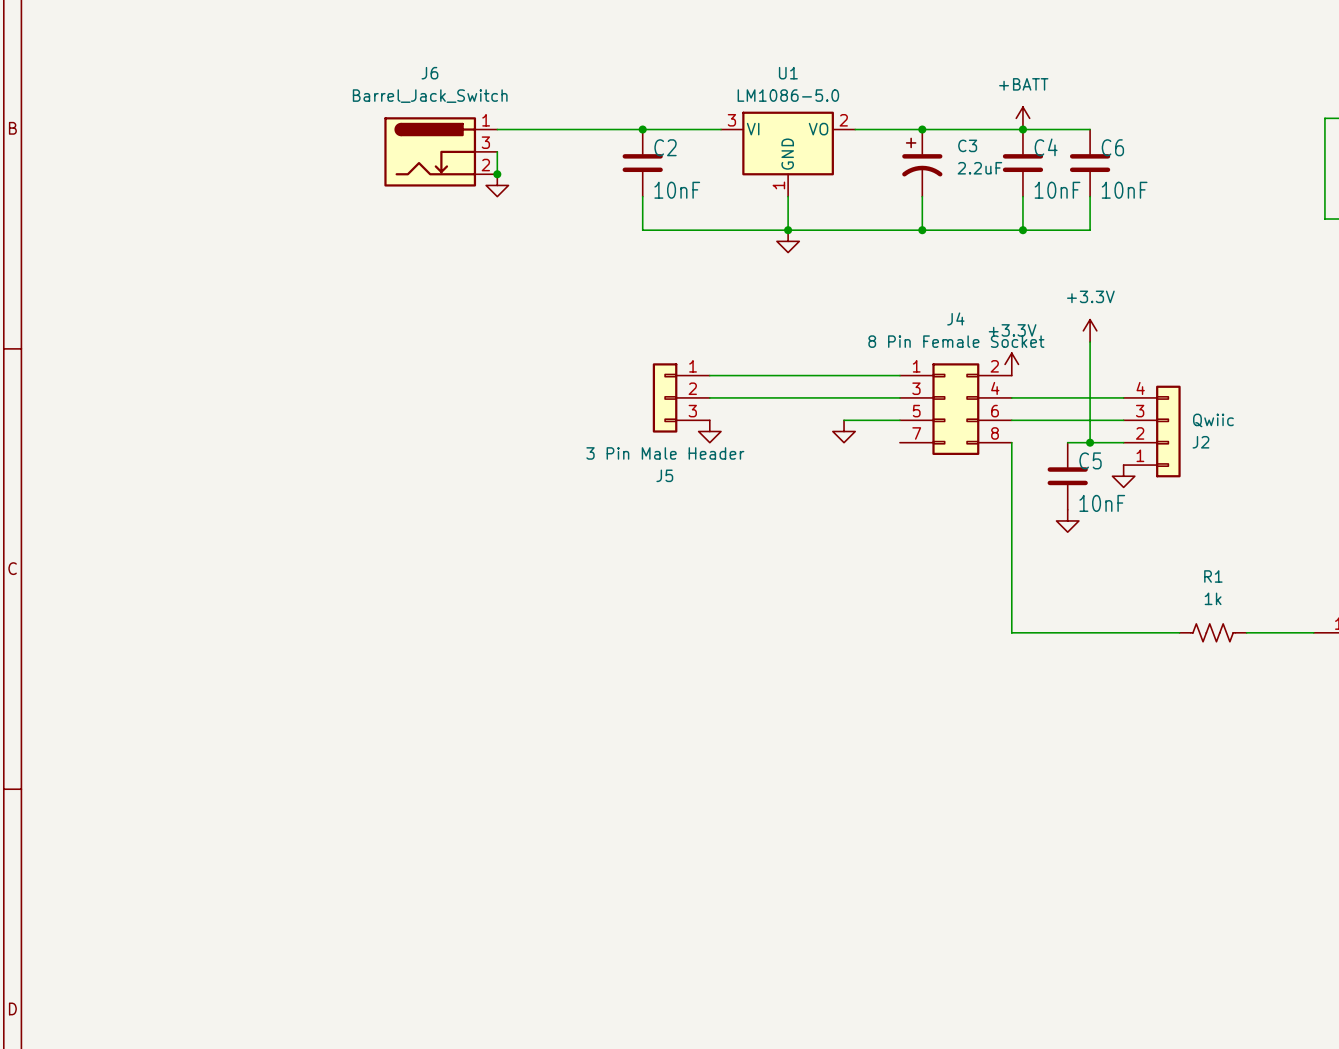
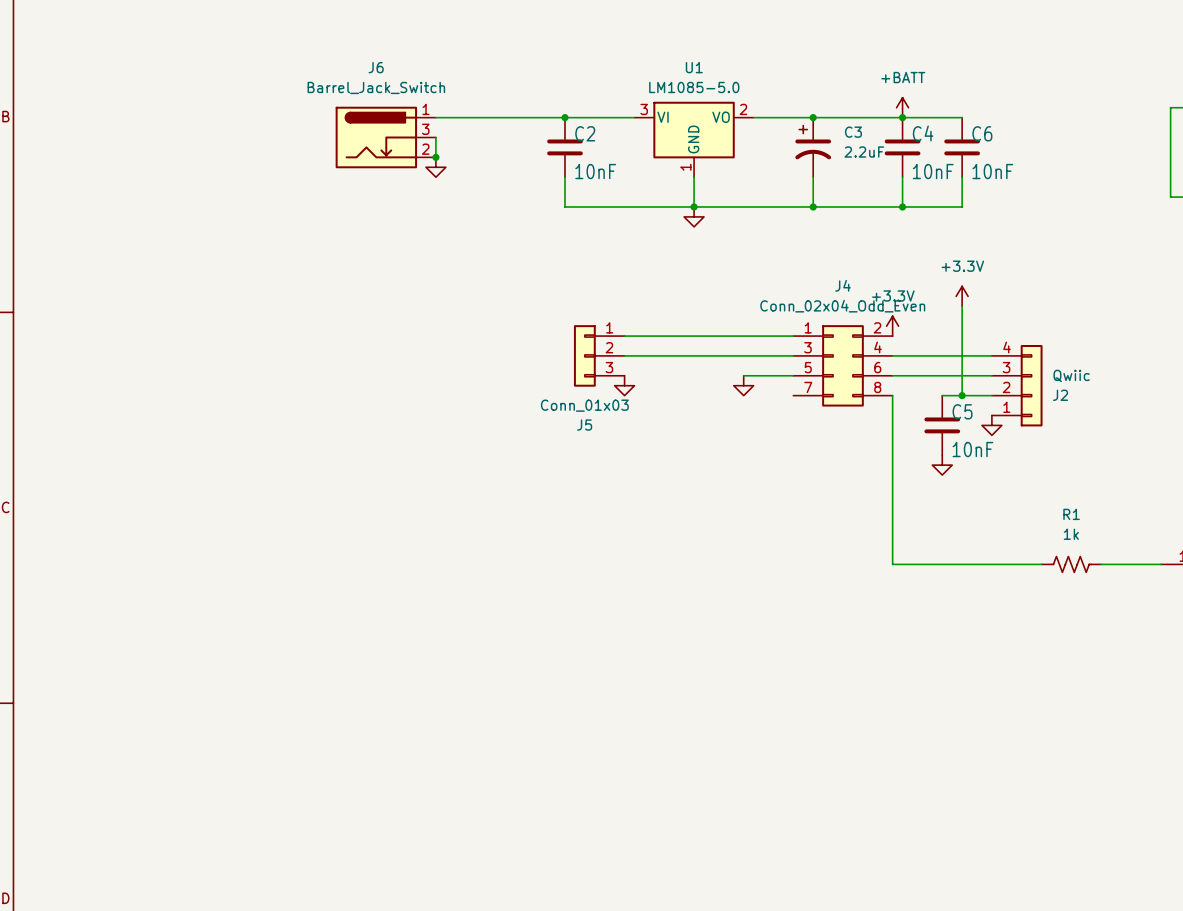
U1 value: LM1086-5.0 (788, 95) -> LM1085-5.0 (694, 87)
J4 value: 8 Pin Female Socket (956, 341) -> Conn_02x04_Odd_Even (842, 306)
J5 value: 3 Pin Male Header (665, 453) -> Conn_01x03 (584, 405)

